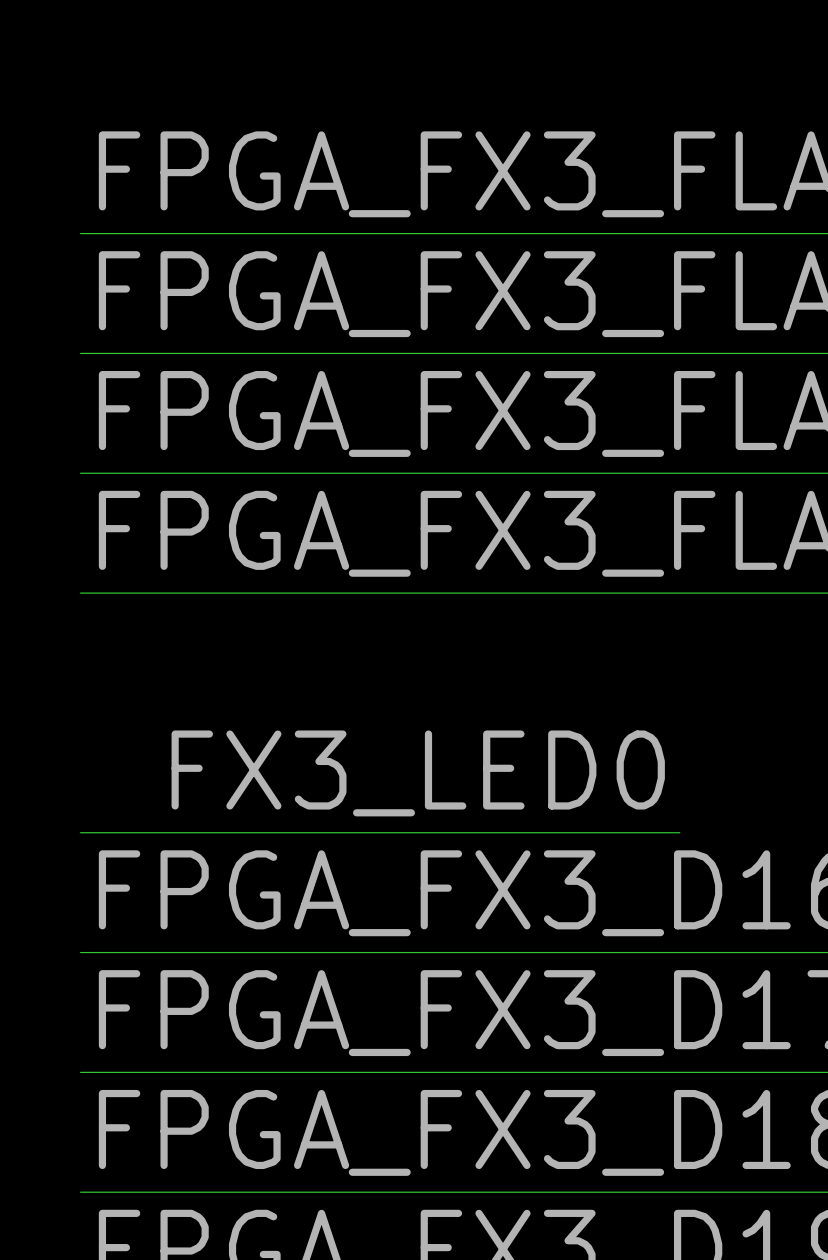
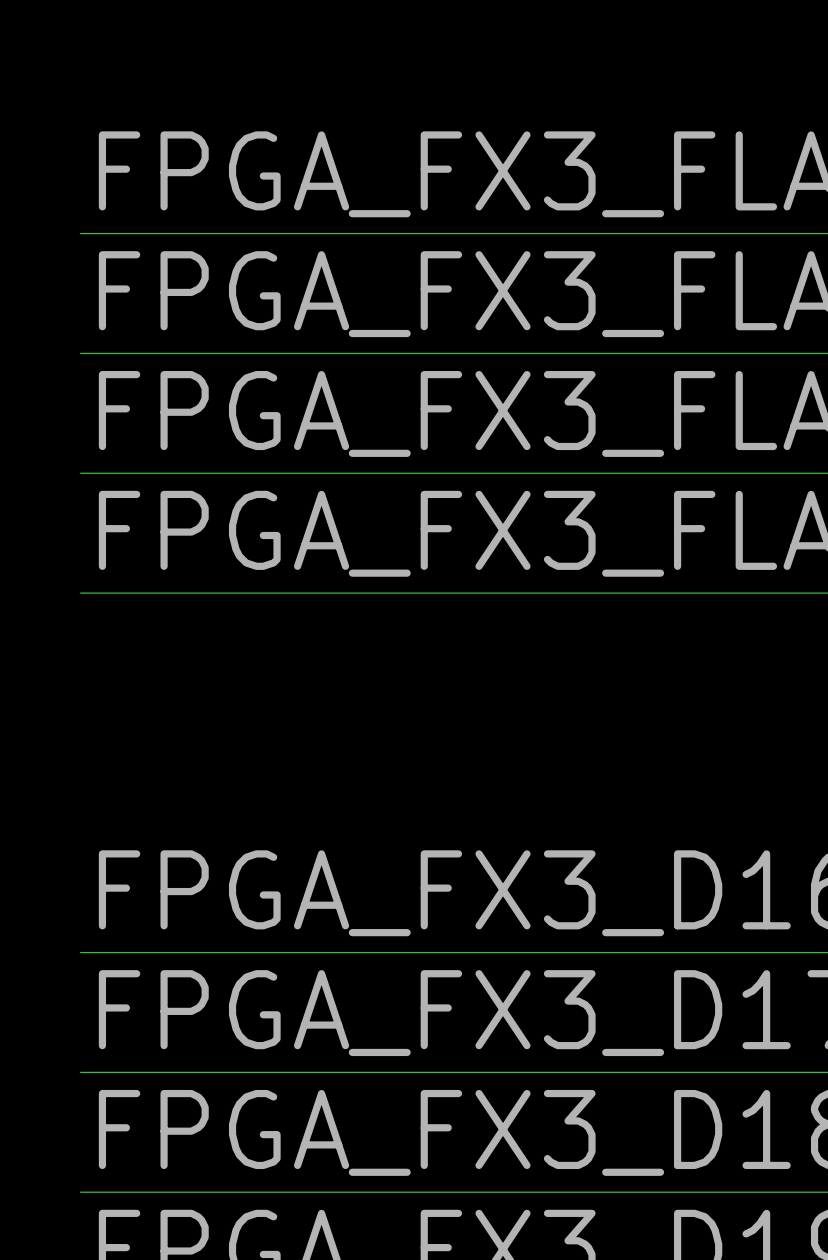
label: FX3_LED0 (418, 773) -> none
wire: (80, 832) (679, 832) -> none

